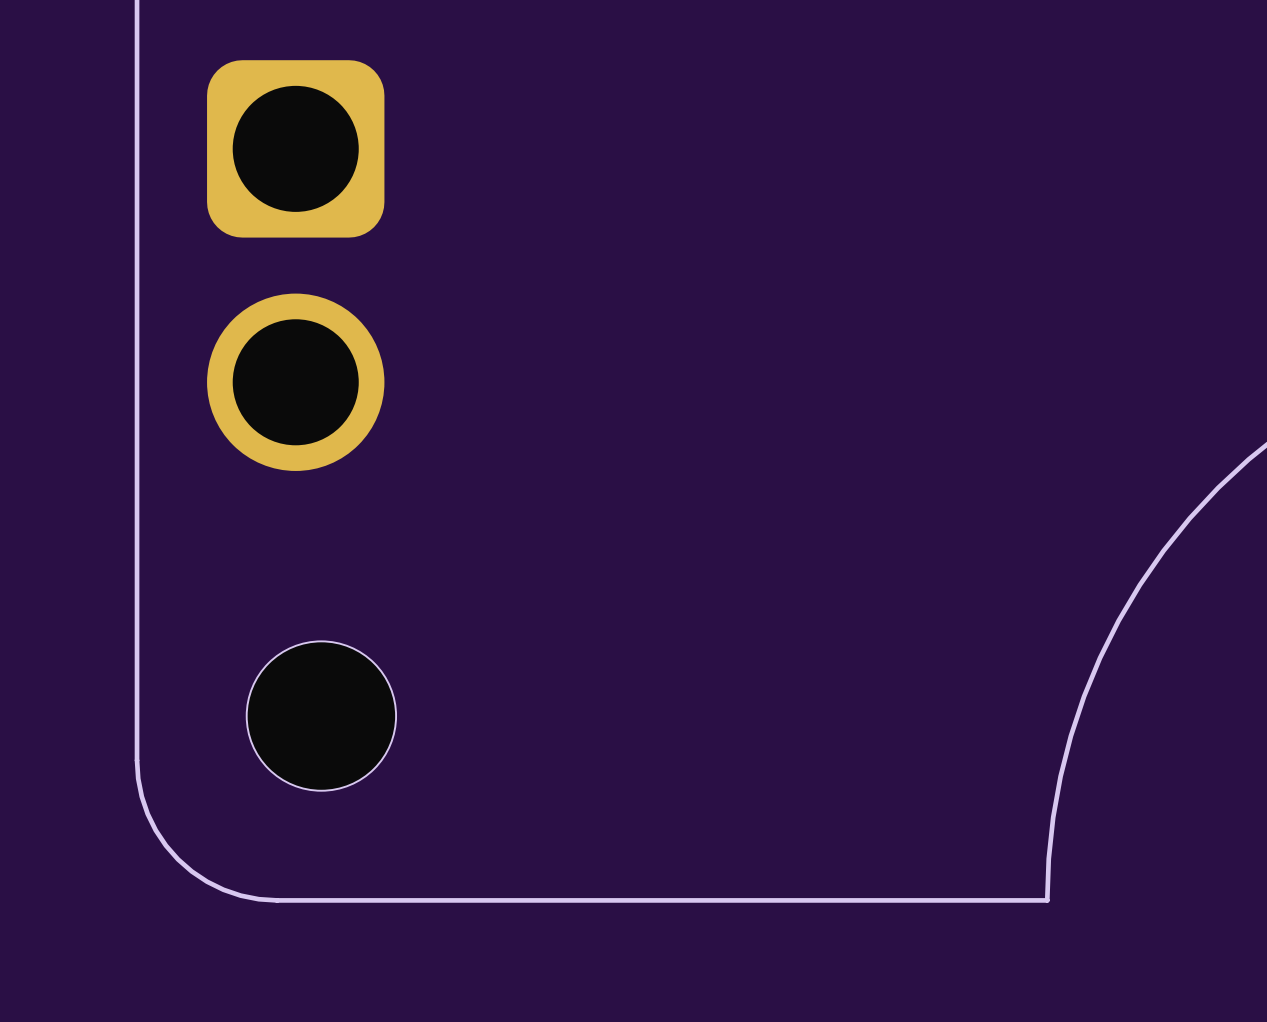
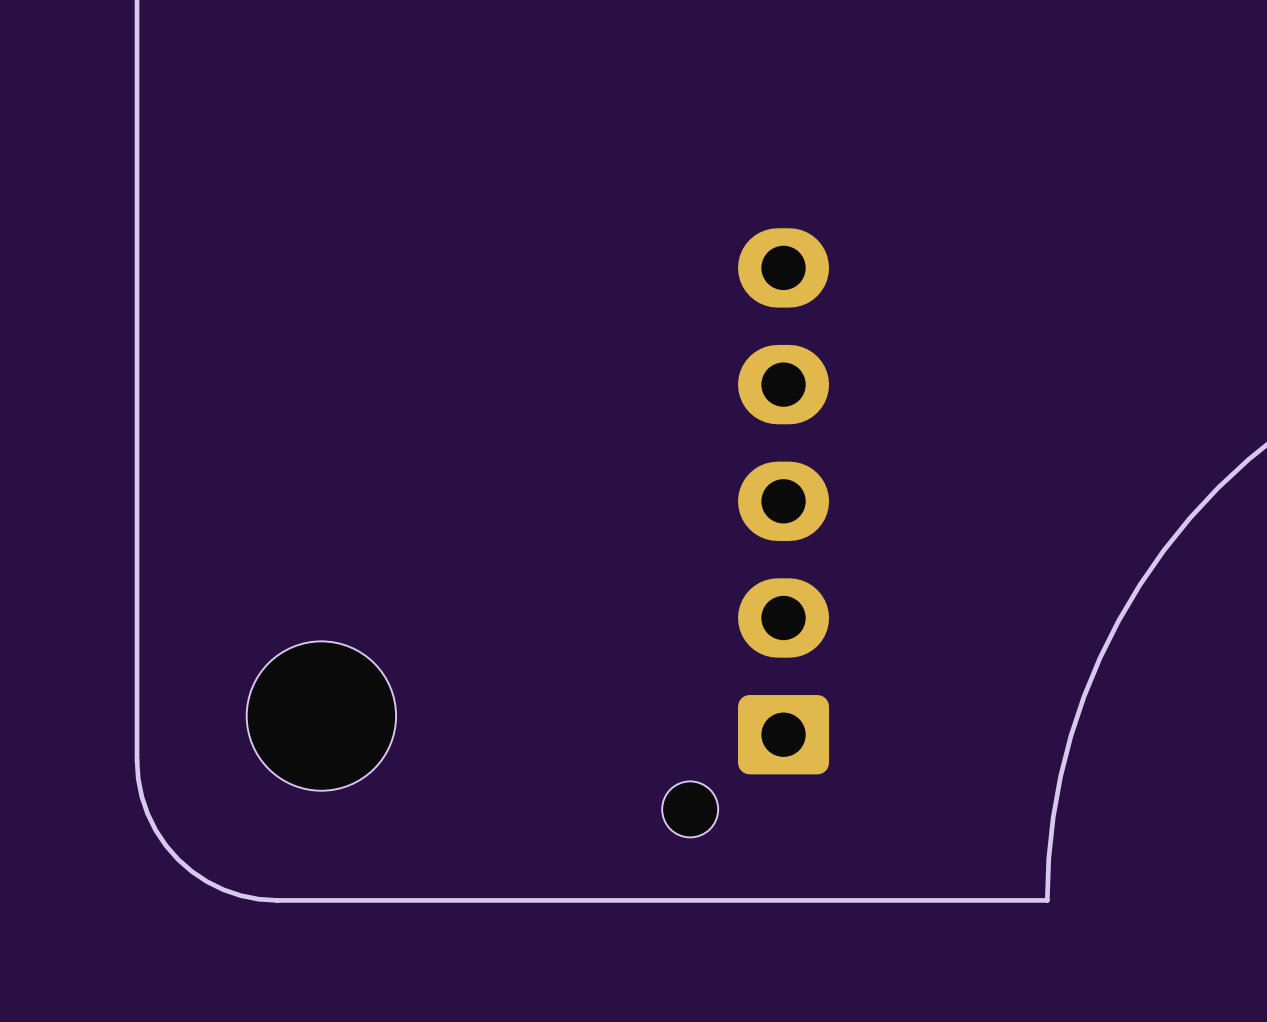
part: (295, 265) -> none
part: none -> (745, 532)

